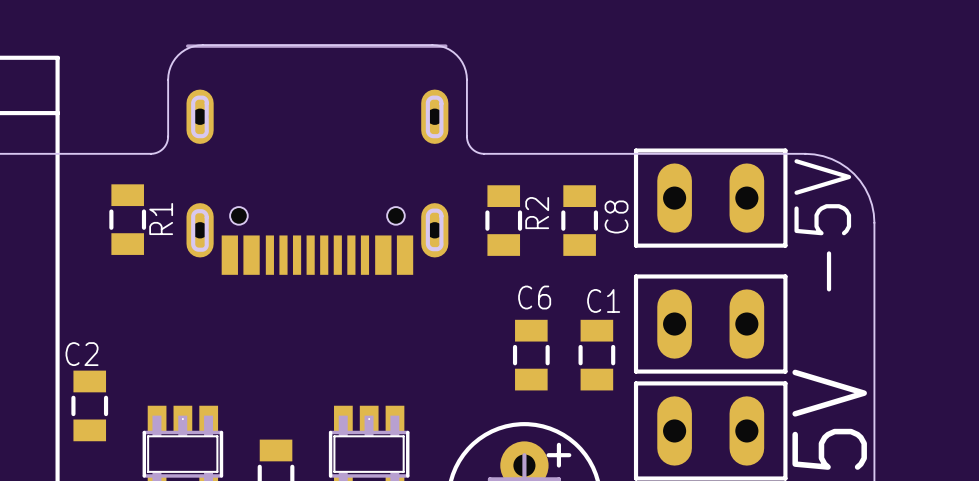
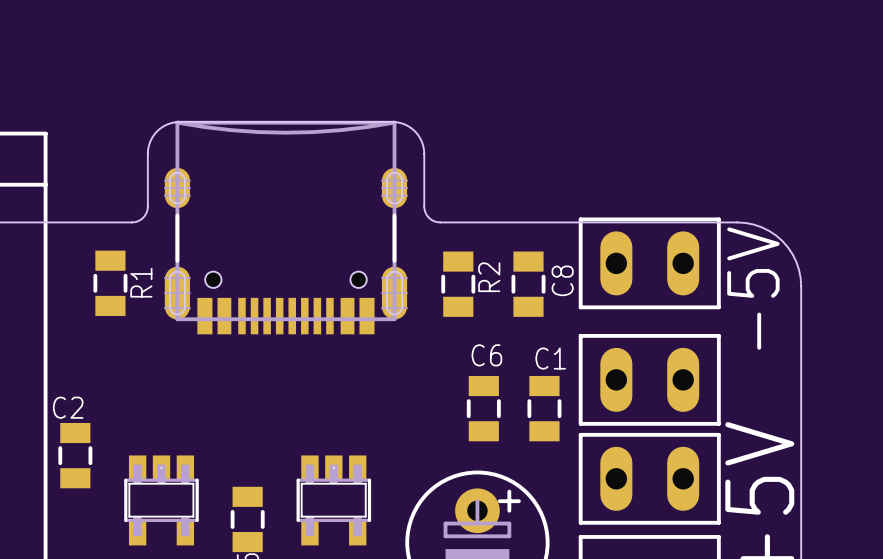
part footprint: [185, 44, 449, 275] -> [164, 120, 408, 335]

